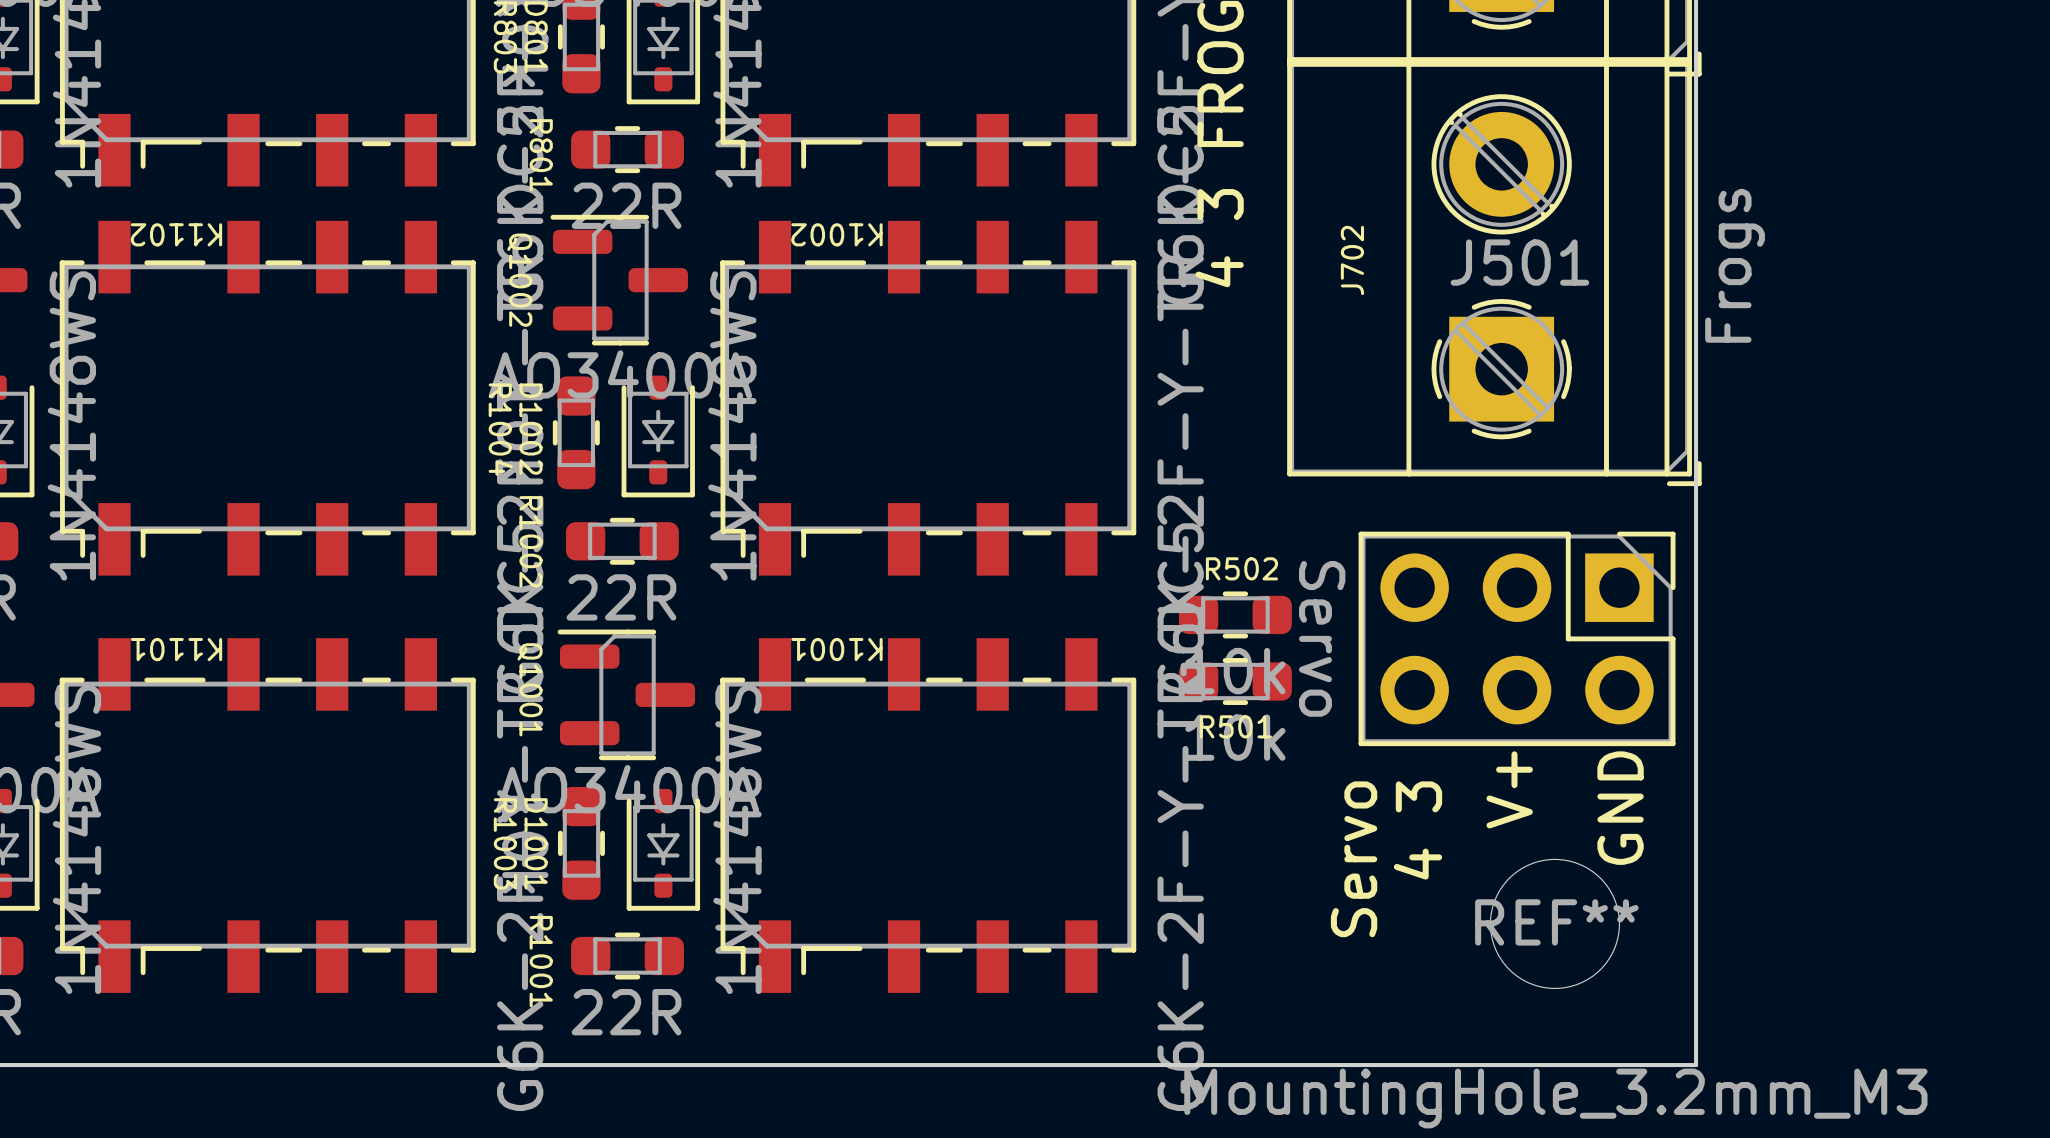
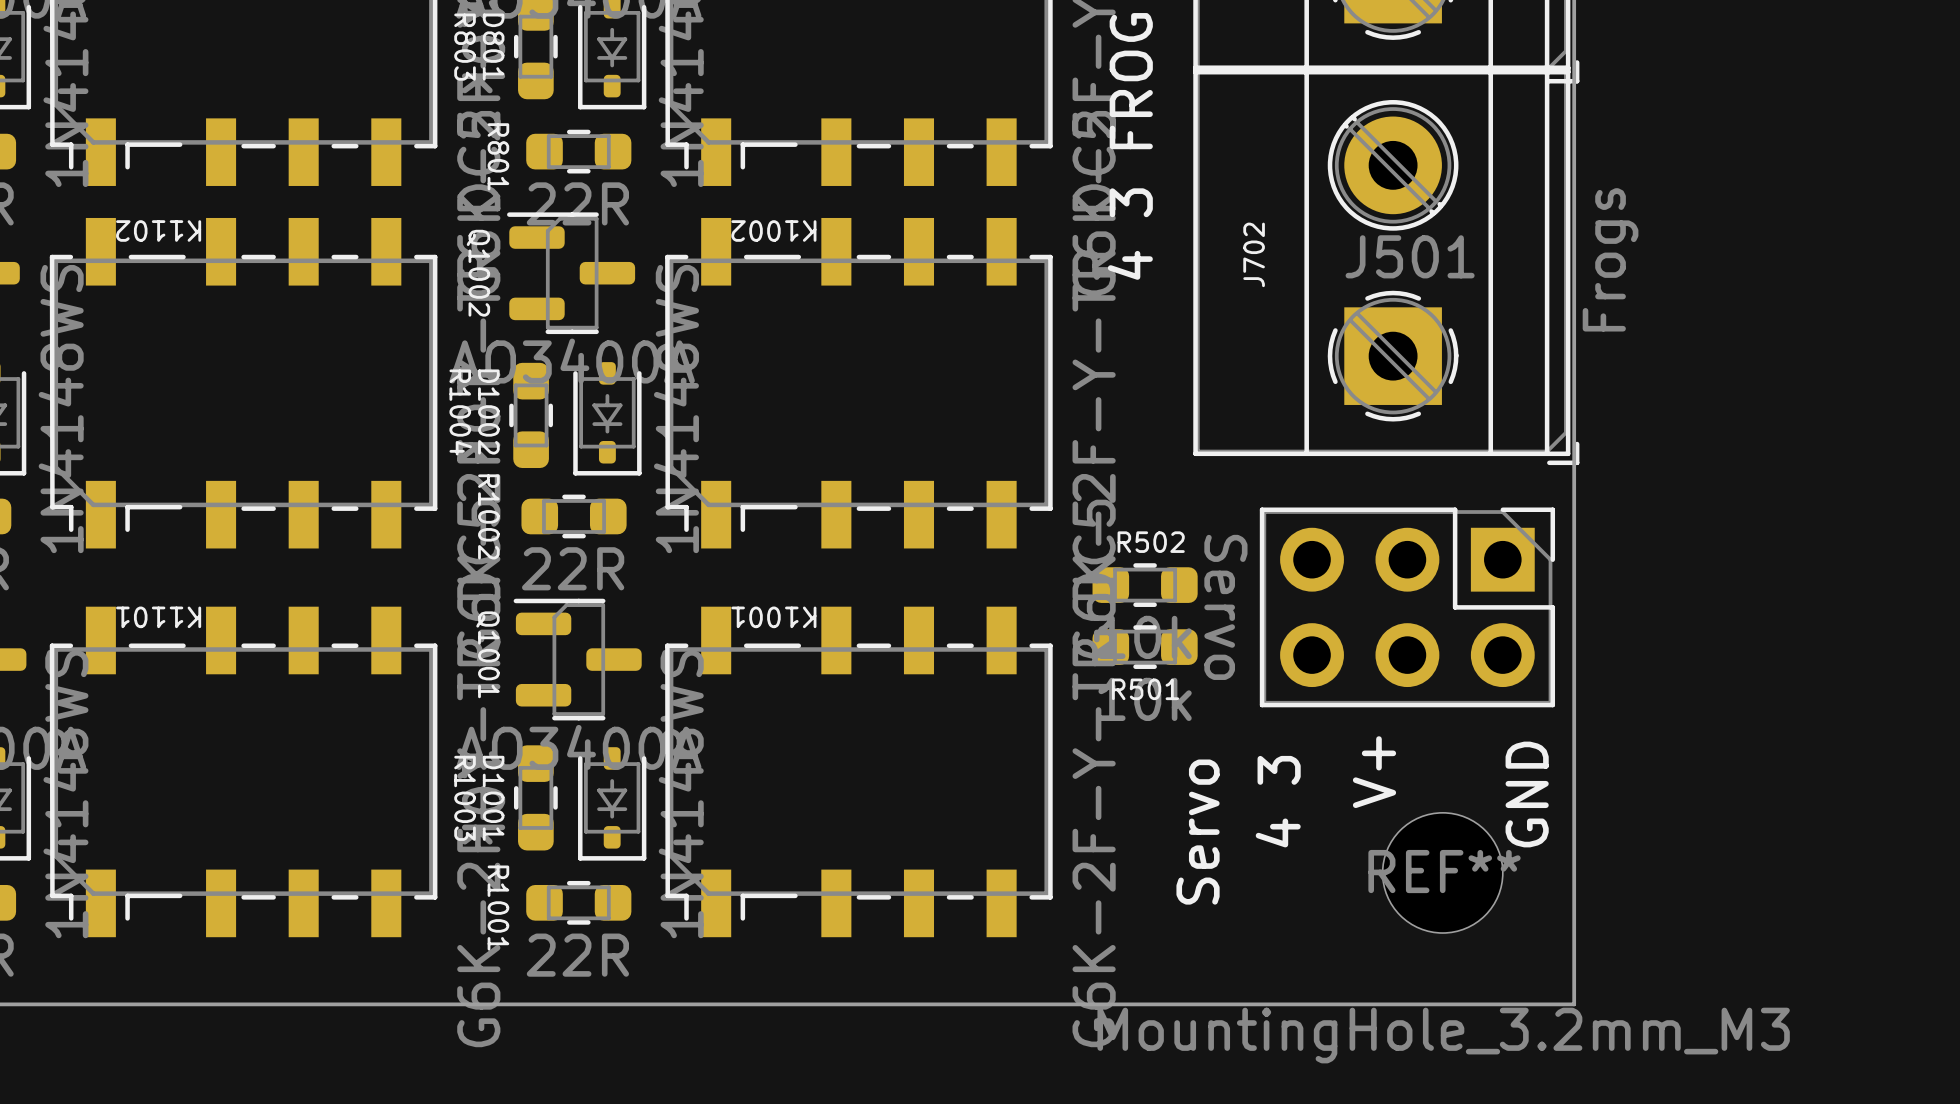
text position: V+ (1509, 789) -> V+ (1374, 772)
text position: GND (1620, 808) -> GND (1527, 794)
text position: 4 3 (1418, 830) -> 4 3 (1278, 801)
text position: Servo (1354, 859) -> Servo (1198, 832)

